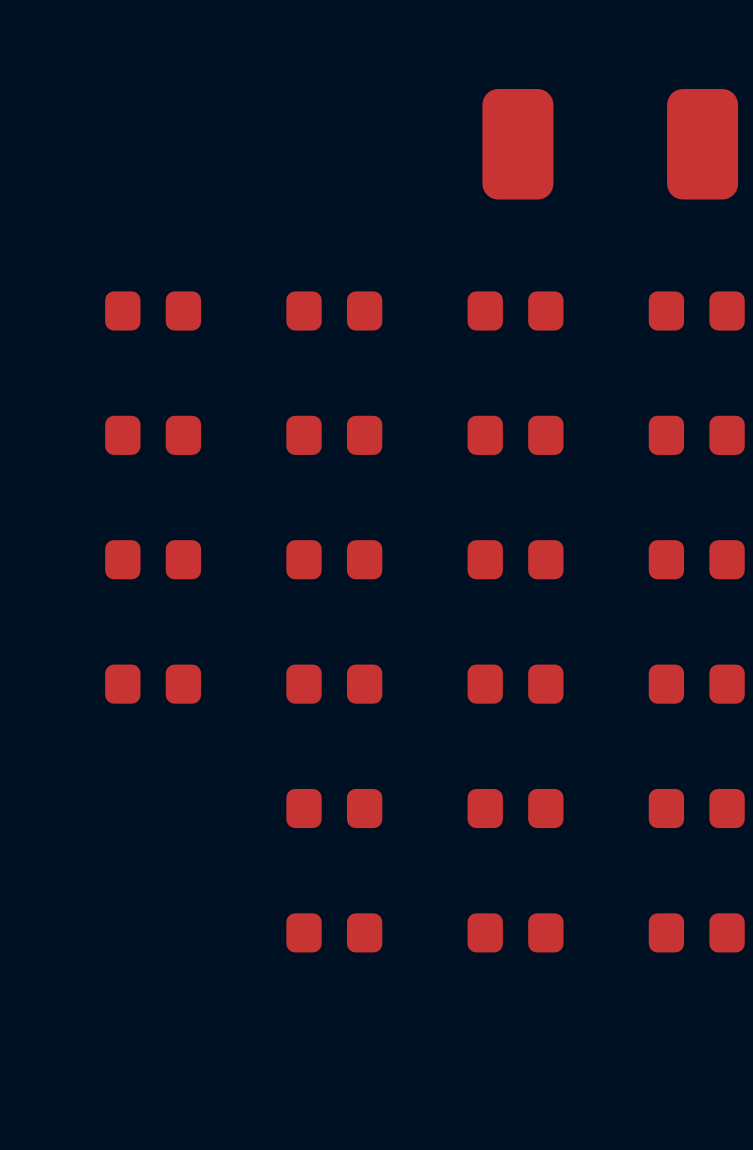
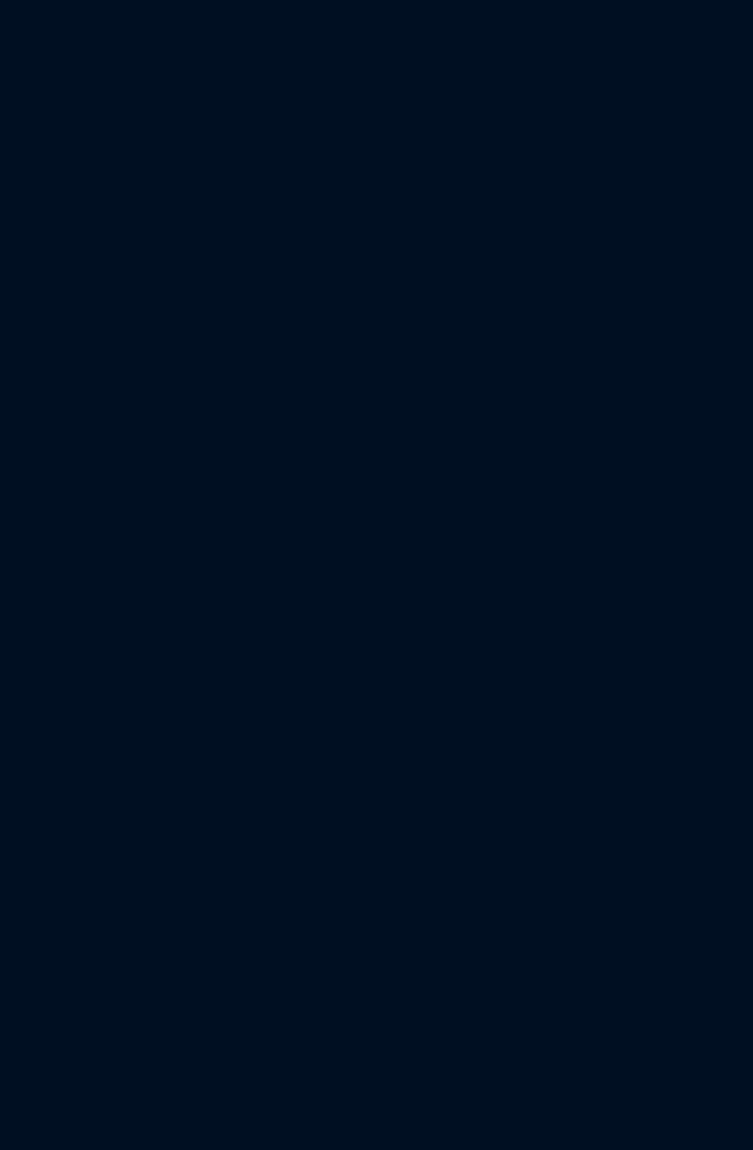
part: (610, 144) -> none
part: (153, 310) -> none
part: (334, 310) -> none
part: (515, 310) -> none
part: (696, 310) -> none
part: (153, 435) -> none
part: (334, 435) -> none
part: (515, 435) -> none
part: (696, 435) -> none
part: (153, 559) -> none
part: (334, 559) -> none
part: (515, 559) -> none
part: (696, 559) -> none
part: (153, 684) -> none
part: (334, 684) -> none
part: (515, 684) -> none
part: (696, 684) -> none
part: (334, 808) -> none
part: (515, 808) -> none
part: (696, 808) -> none
part: (334, 932) -> none
part: (515, 932) -> none
part: (696, 932) -> none

